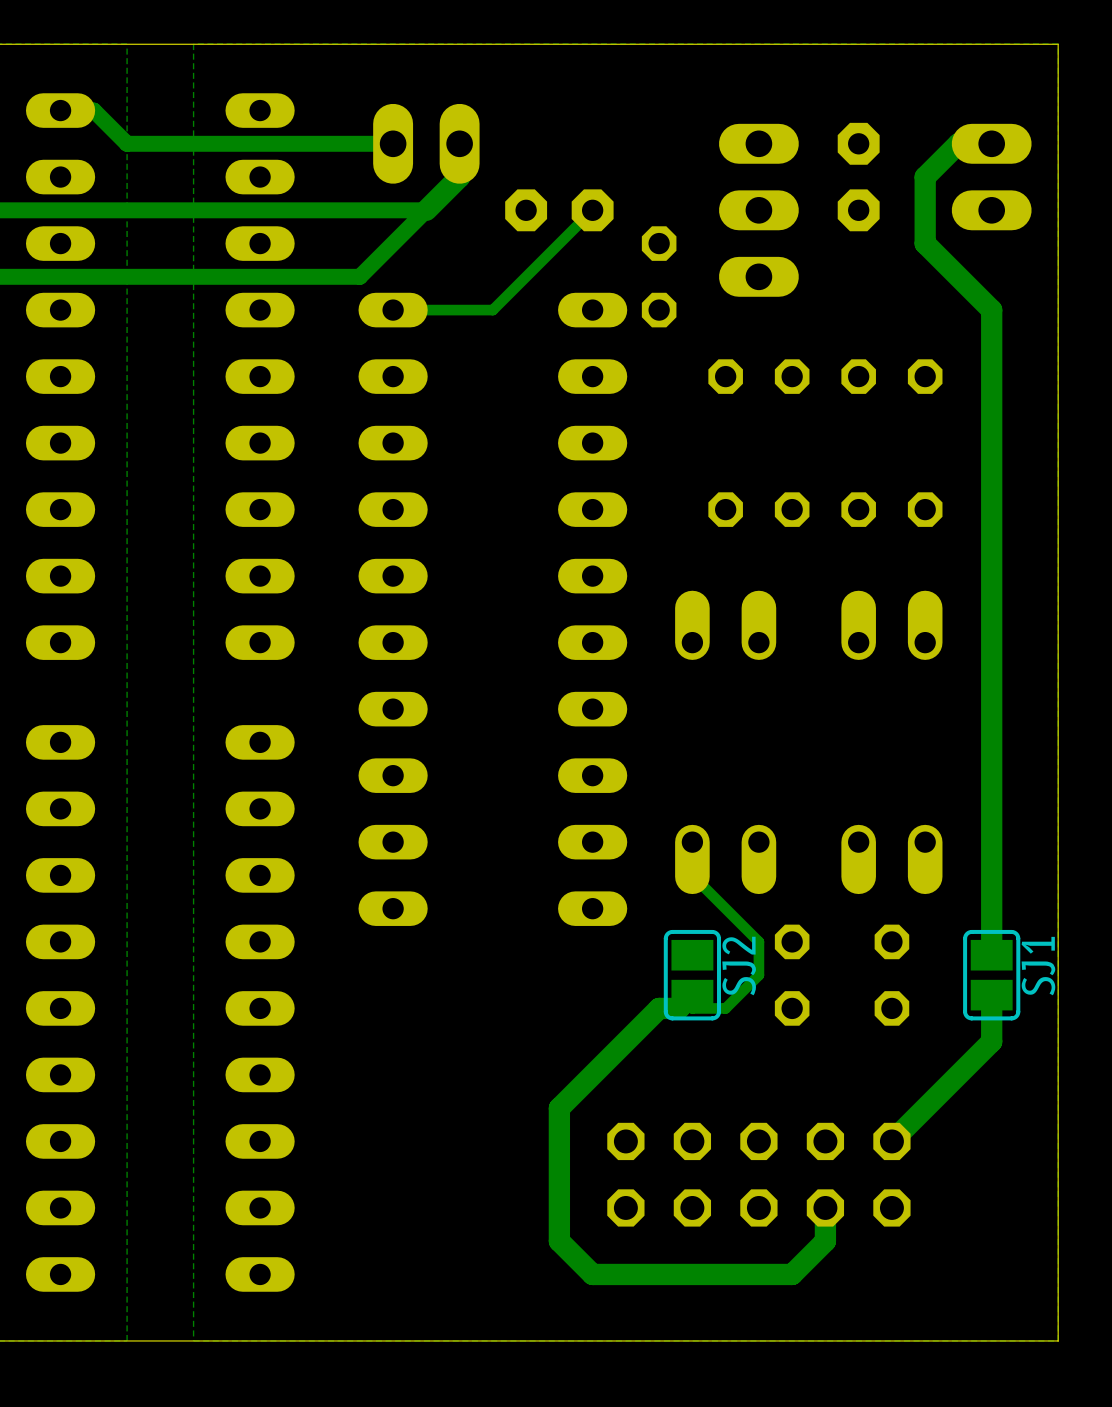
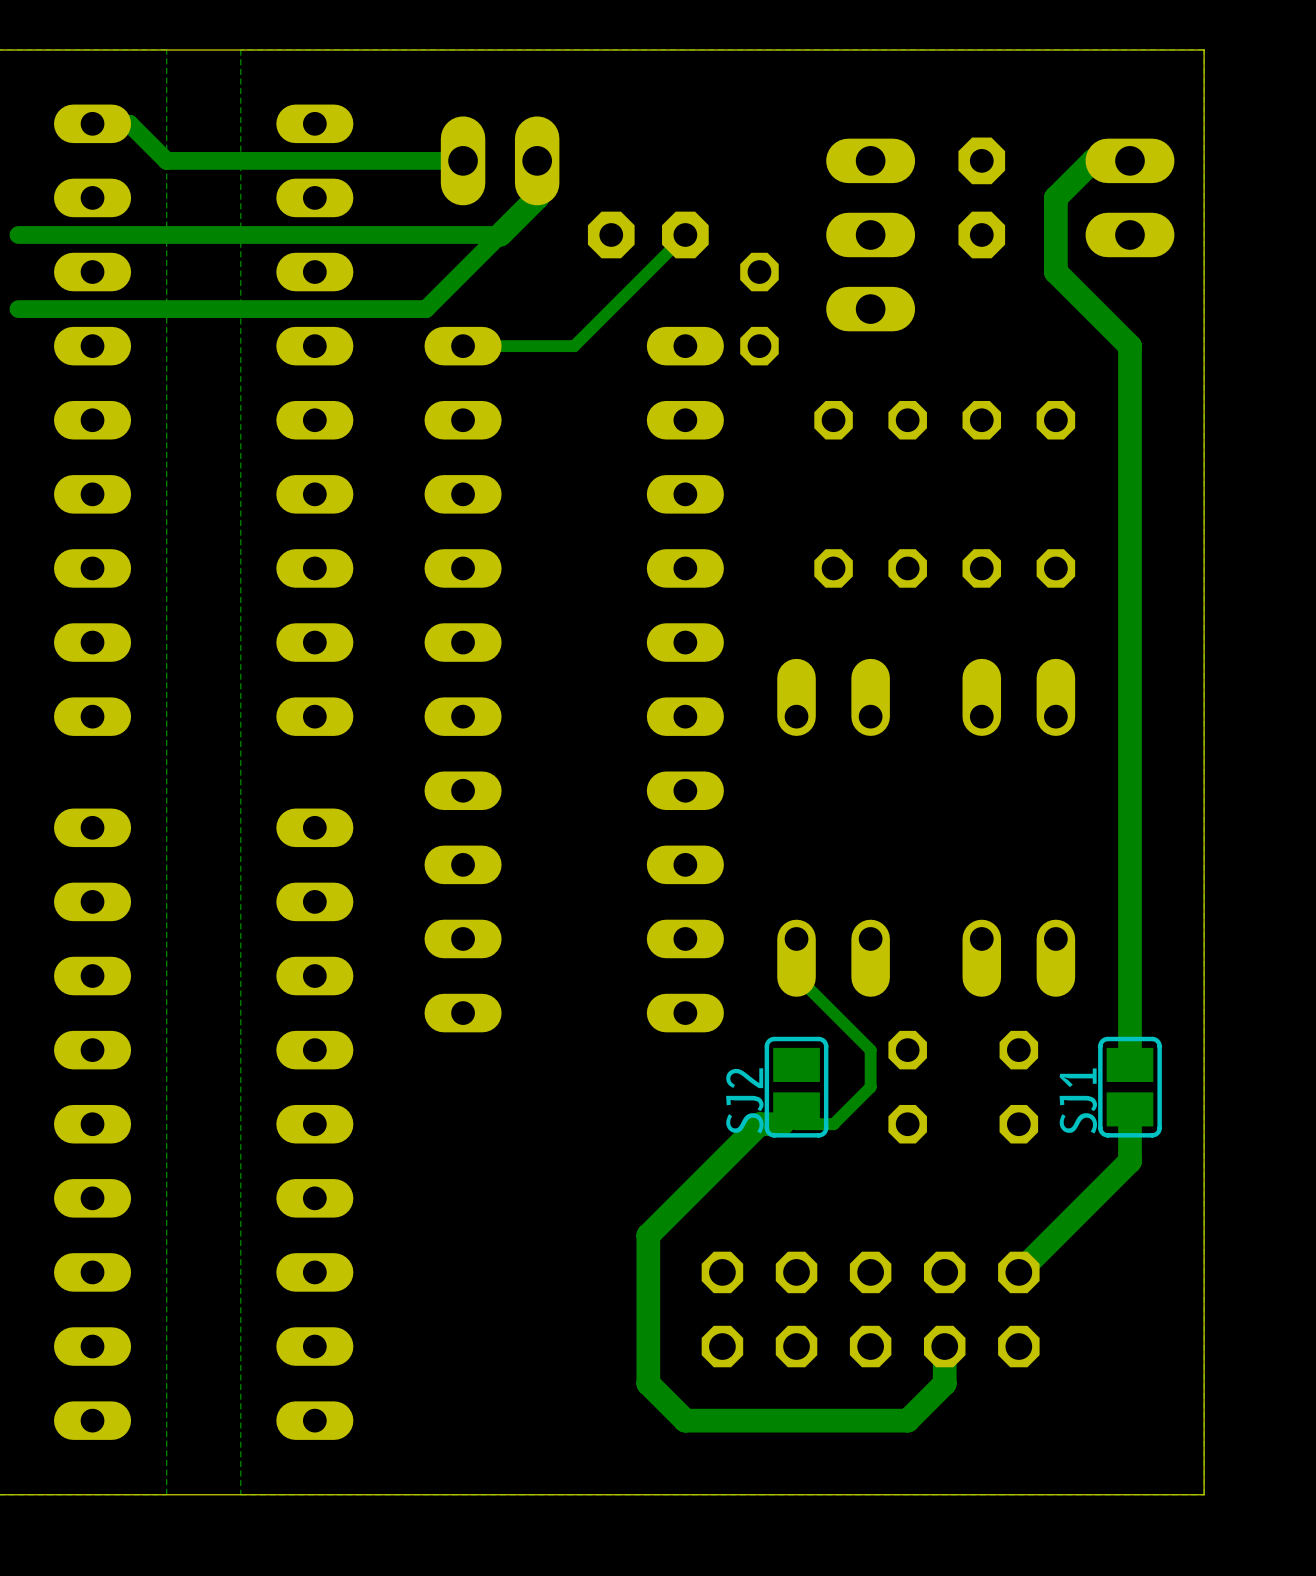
SJ2 name position: SJ2 (739, 966) -> SJ2 (744, 1100)
SJ1 name position: SJ1 (1038, 966) -> SJ1 (1078, 1100)

